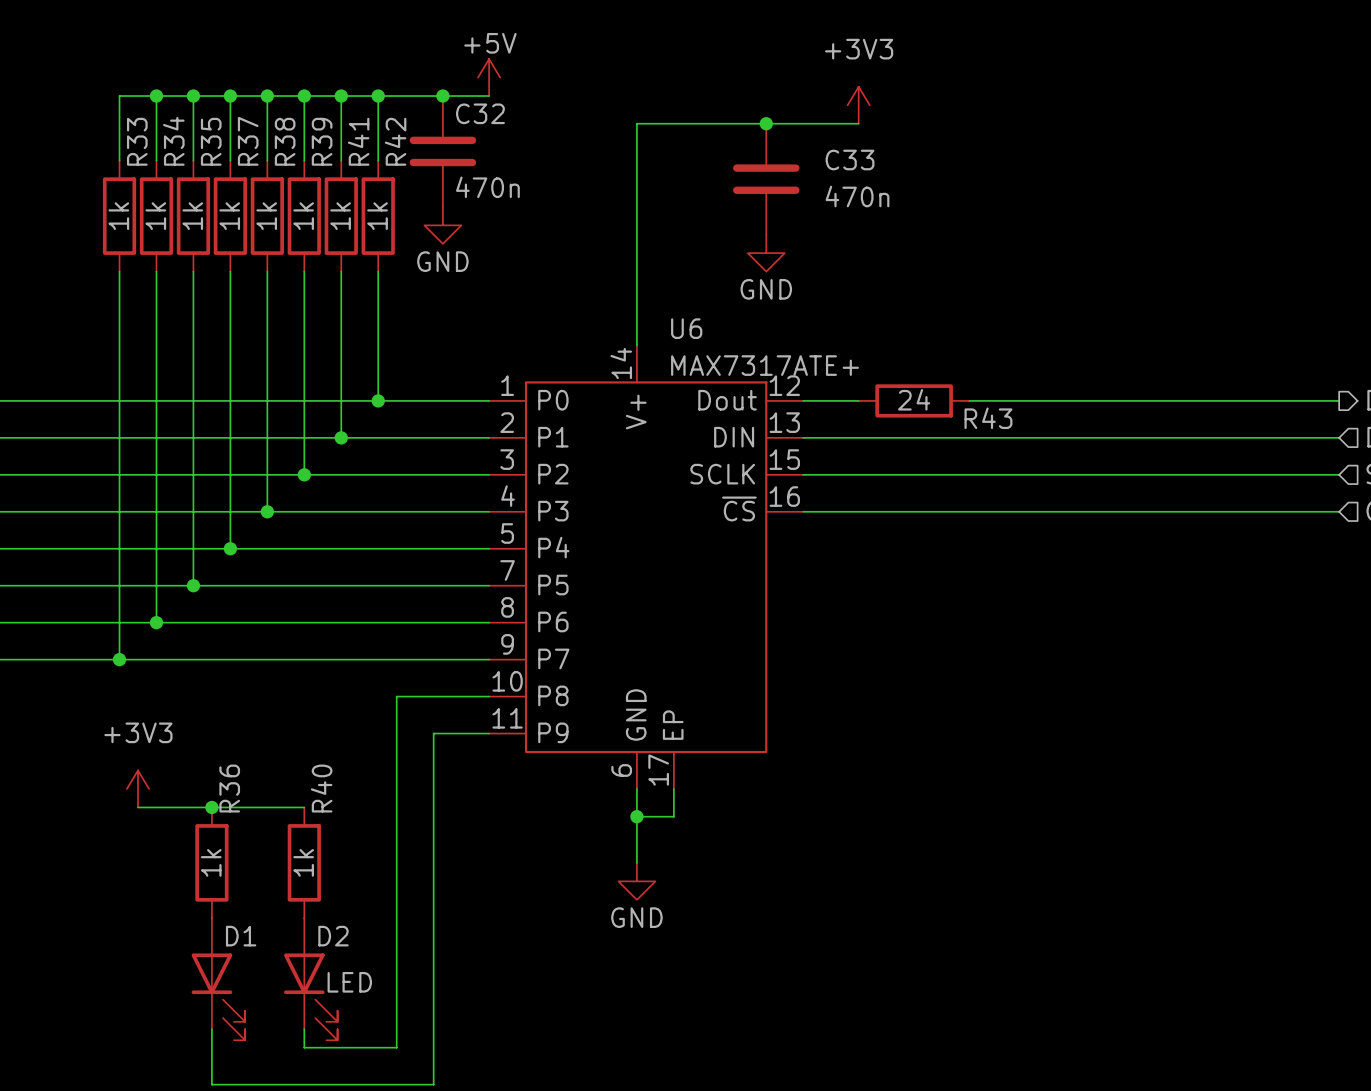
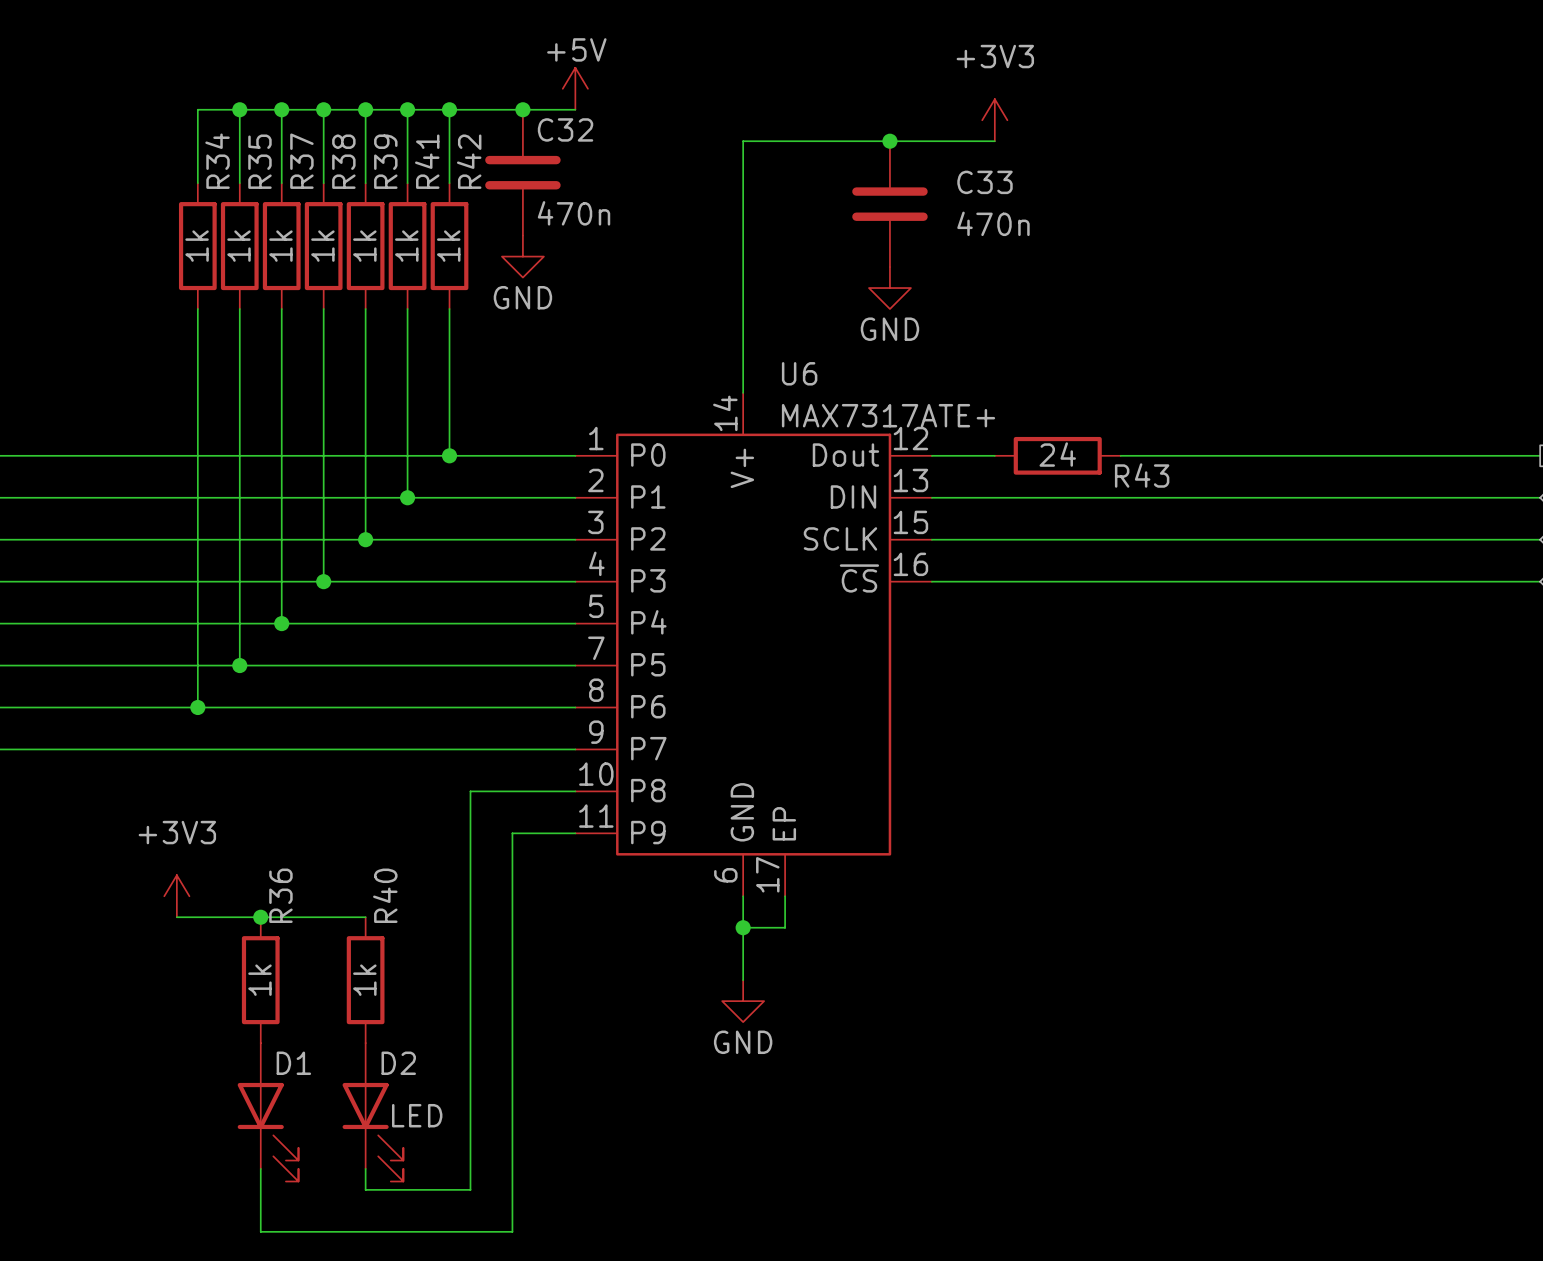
wire: (156, 96) (119, 96) (119, 160) -> none
junction: (156, 96) -> none
R33: 1k (119, 216) -> none
wire: (119, 271) (119, 659) -> none
junction: (119, 659) -> none

